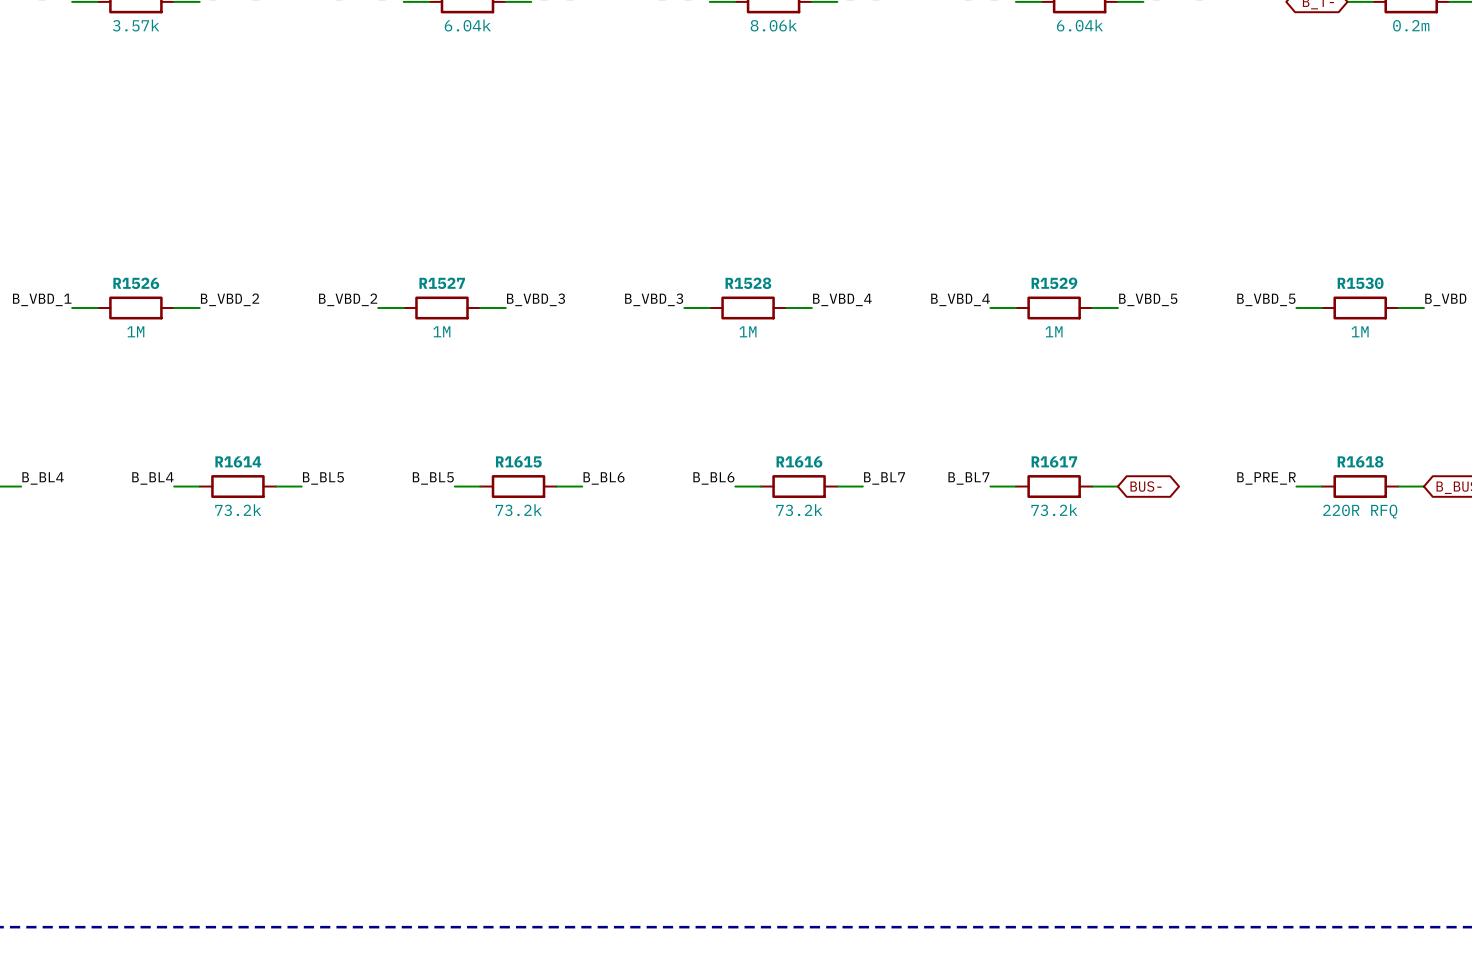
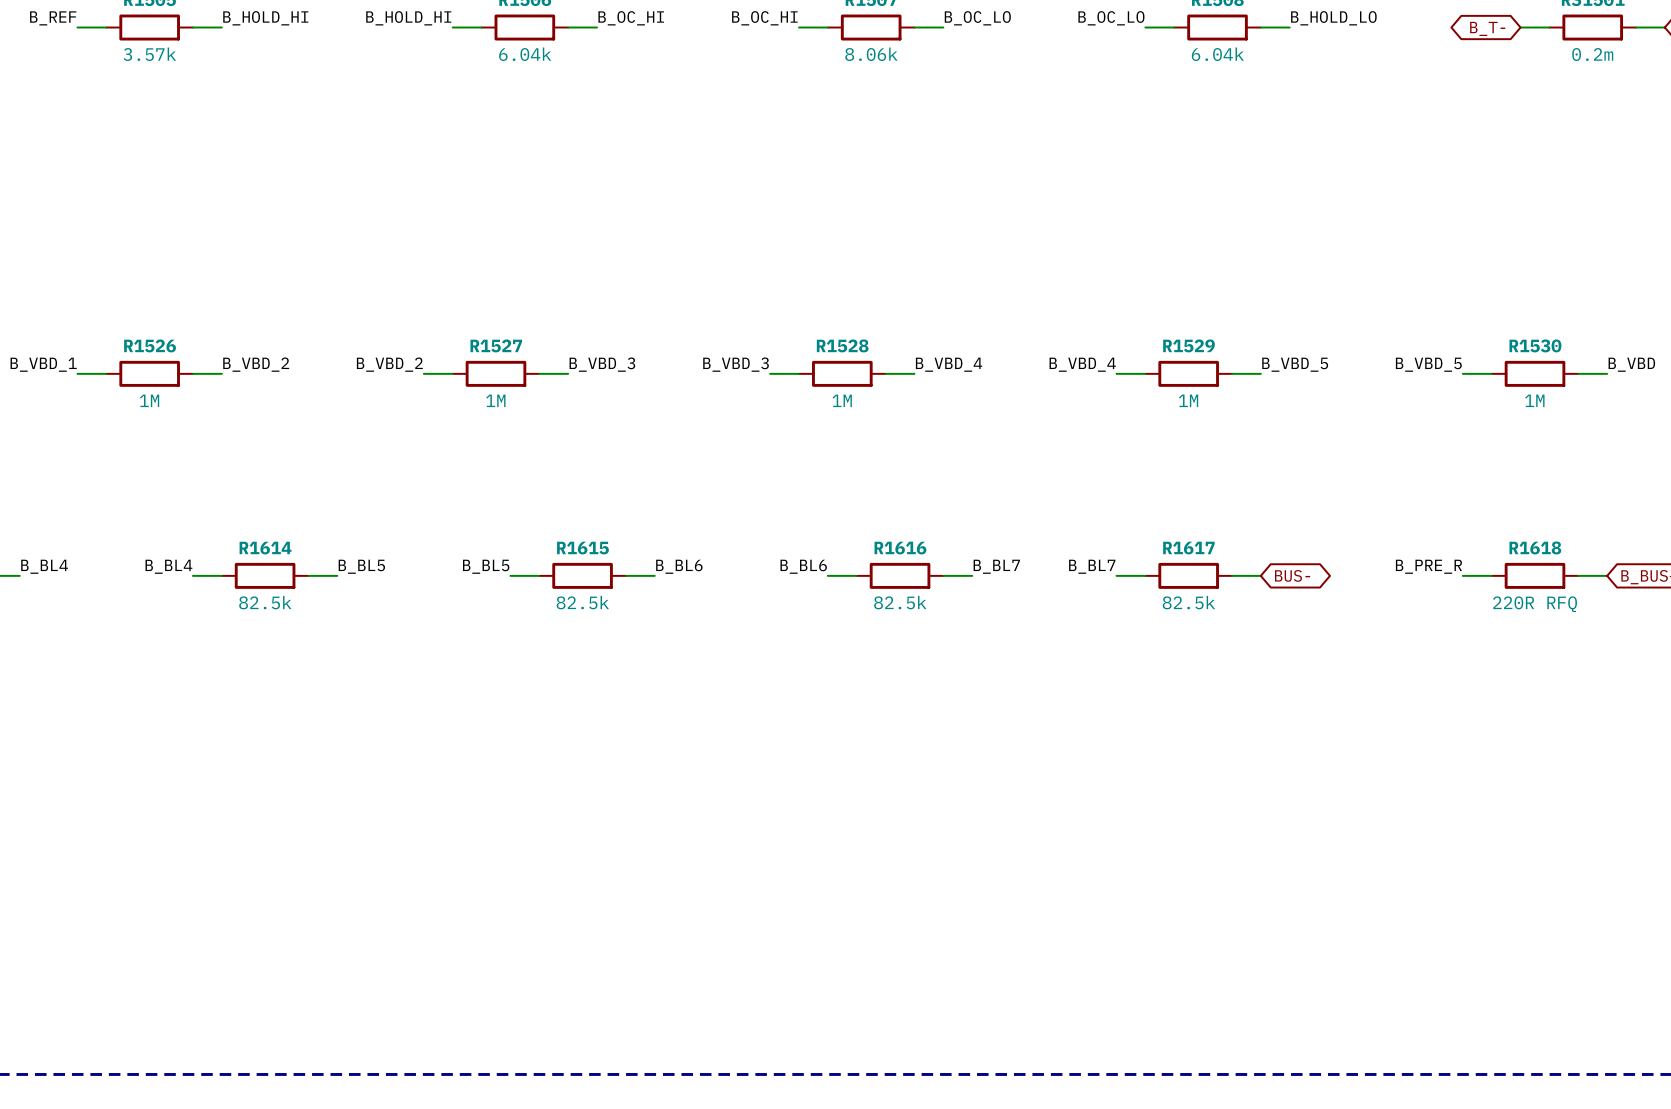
R1614 value: 73.2k (238, 510) -> 82.5k (265, 602)
R1615 value: 73.2k (518, 510) -> 82.5k (582, 602)
R1616 value: 73.2k (799, 510) -> 82.5k (900, 602)
R1617 value: 73.2k (1054, 510) -> 82.5k (1188, 602)

